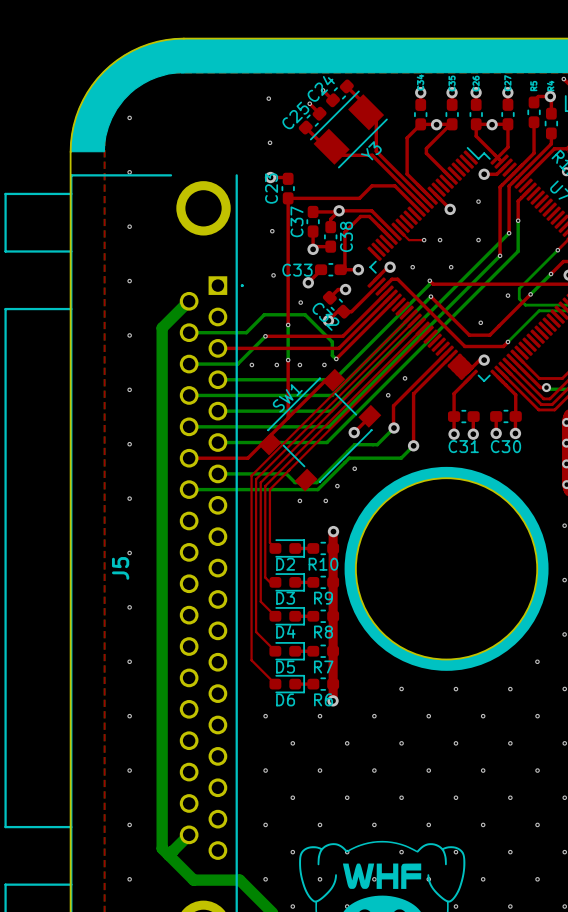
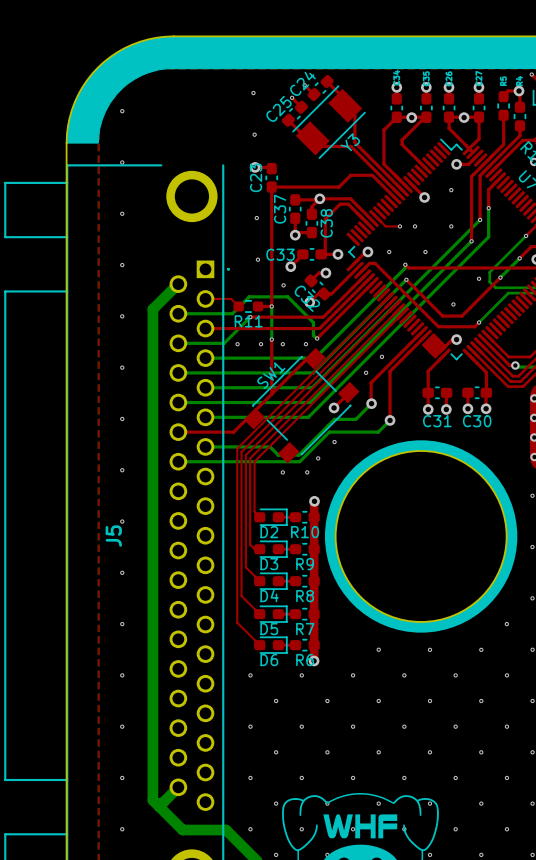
top track: none -> (205, 298) (231, 298) (238, 306)
R11: none -> (248, 306)
top track: none -> (258, 306) (271, 306)

